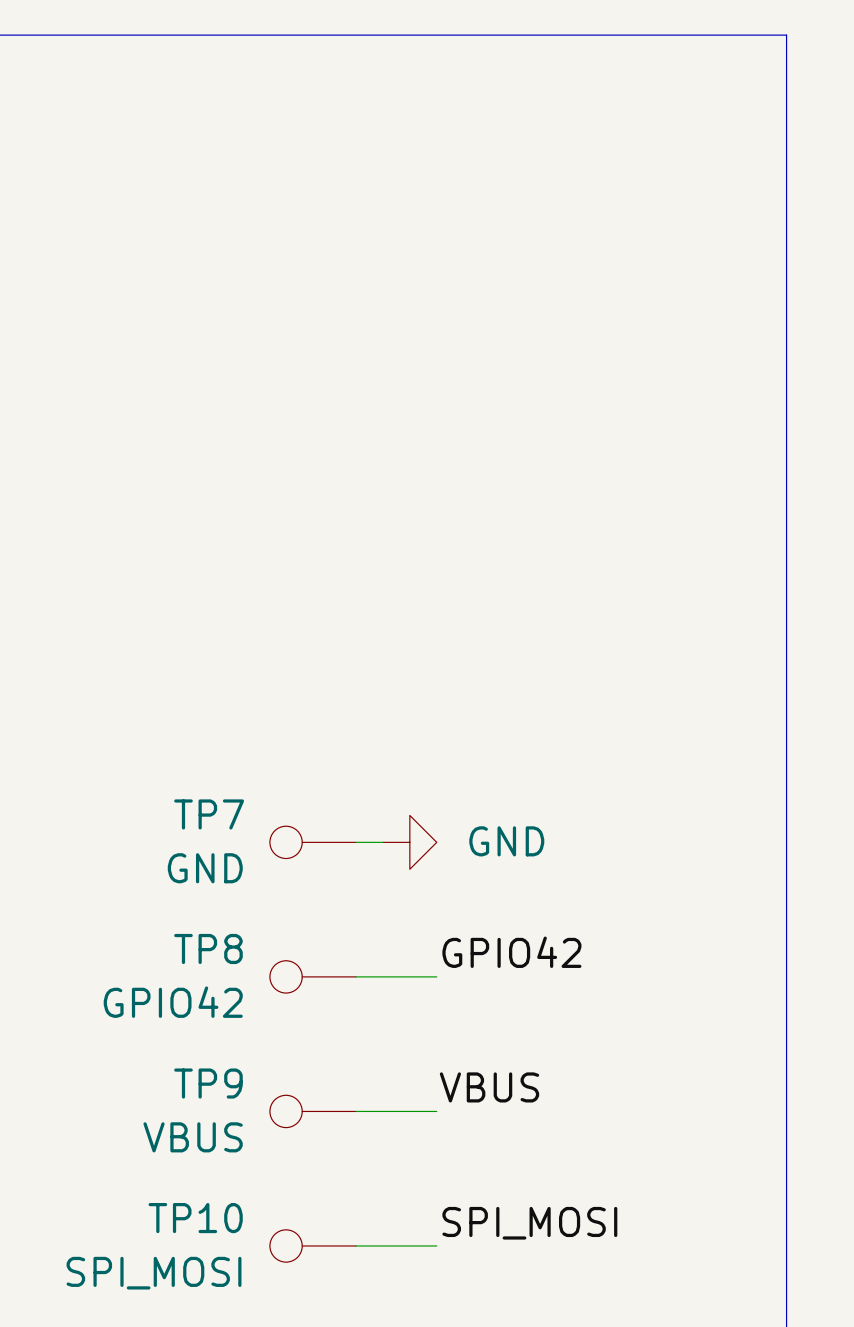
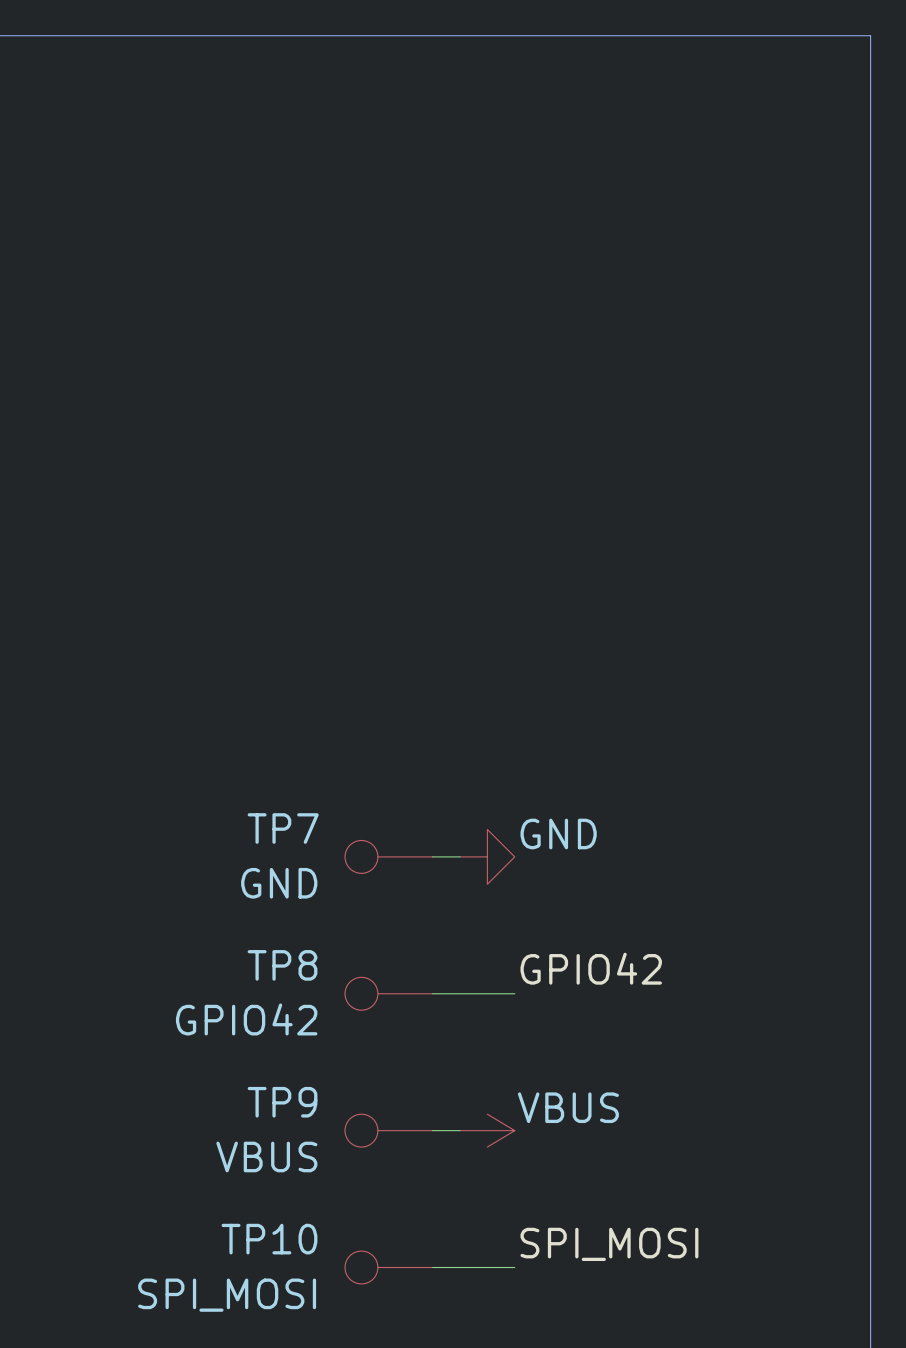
power symbol text position: GND (506, 841) -> GND (558, 833)
label: VBUS (489, 1087) -> none
power symbol: none -> VBUS (487, 1130)

